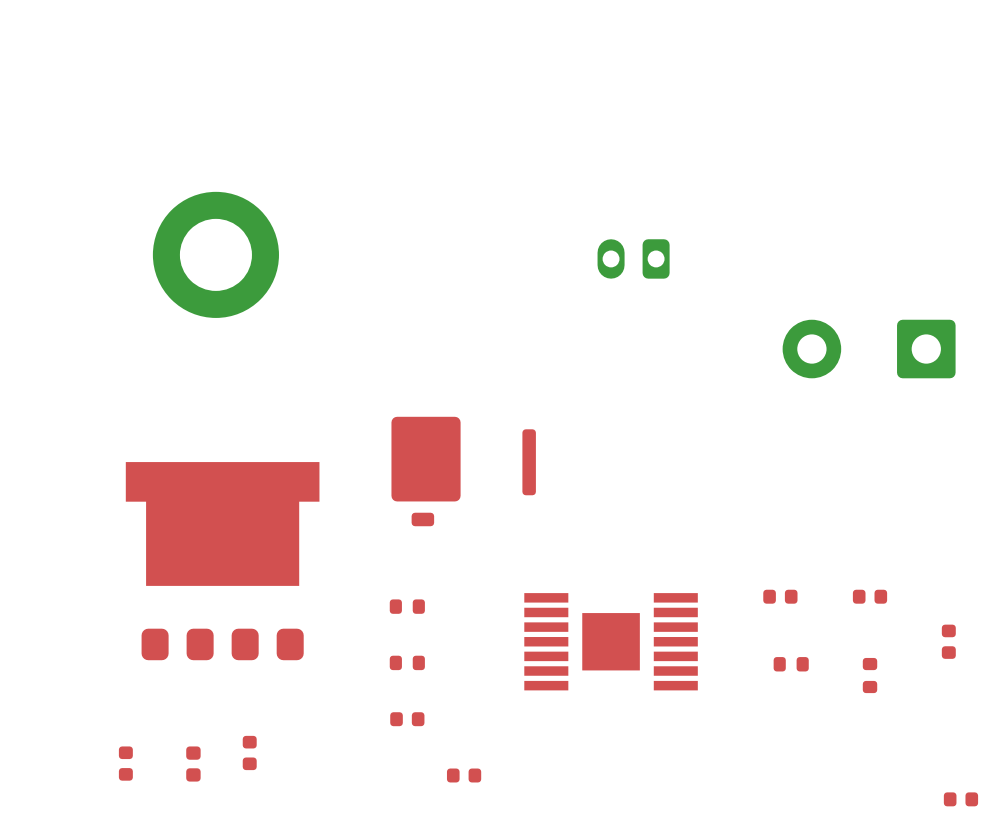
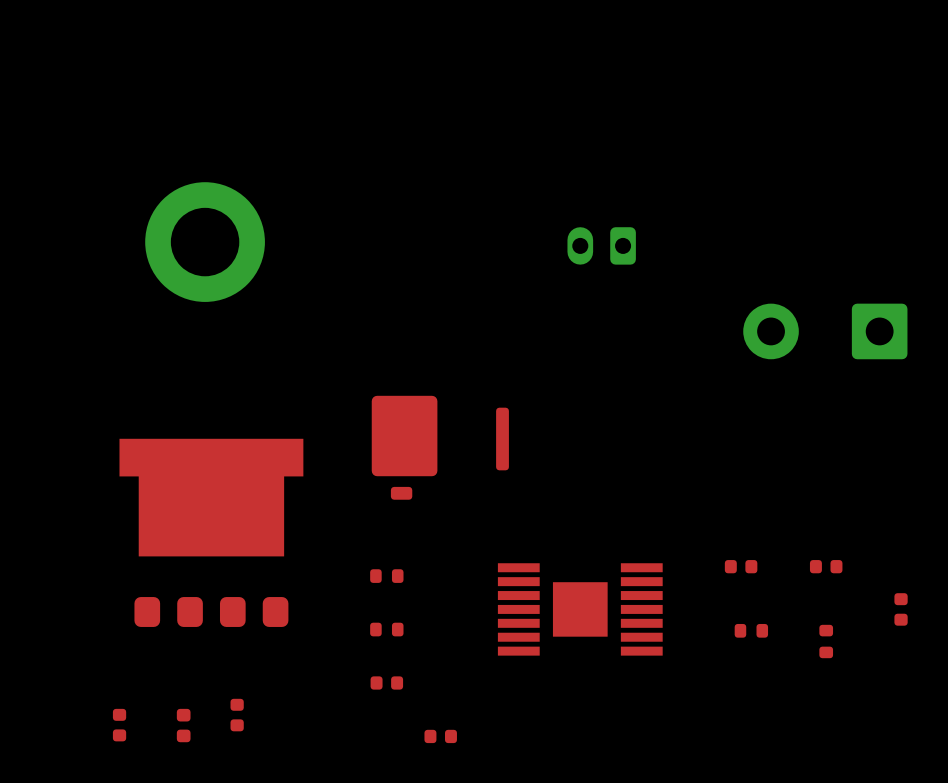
part: (960, 799) -> none

